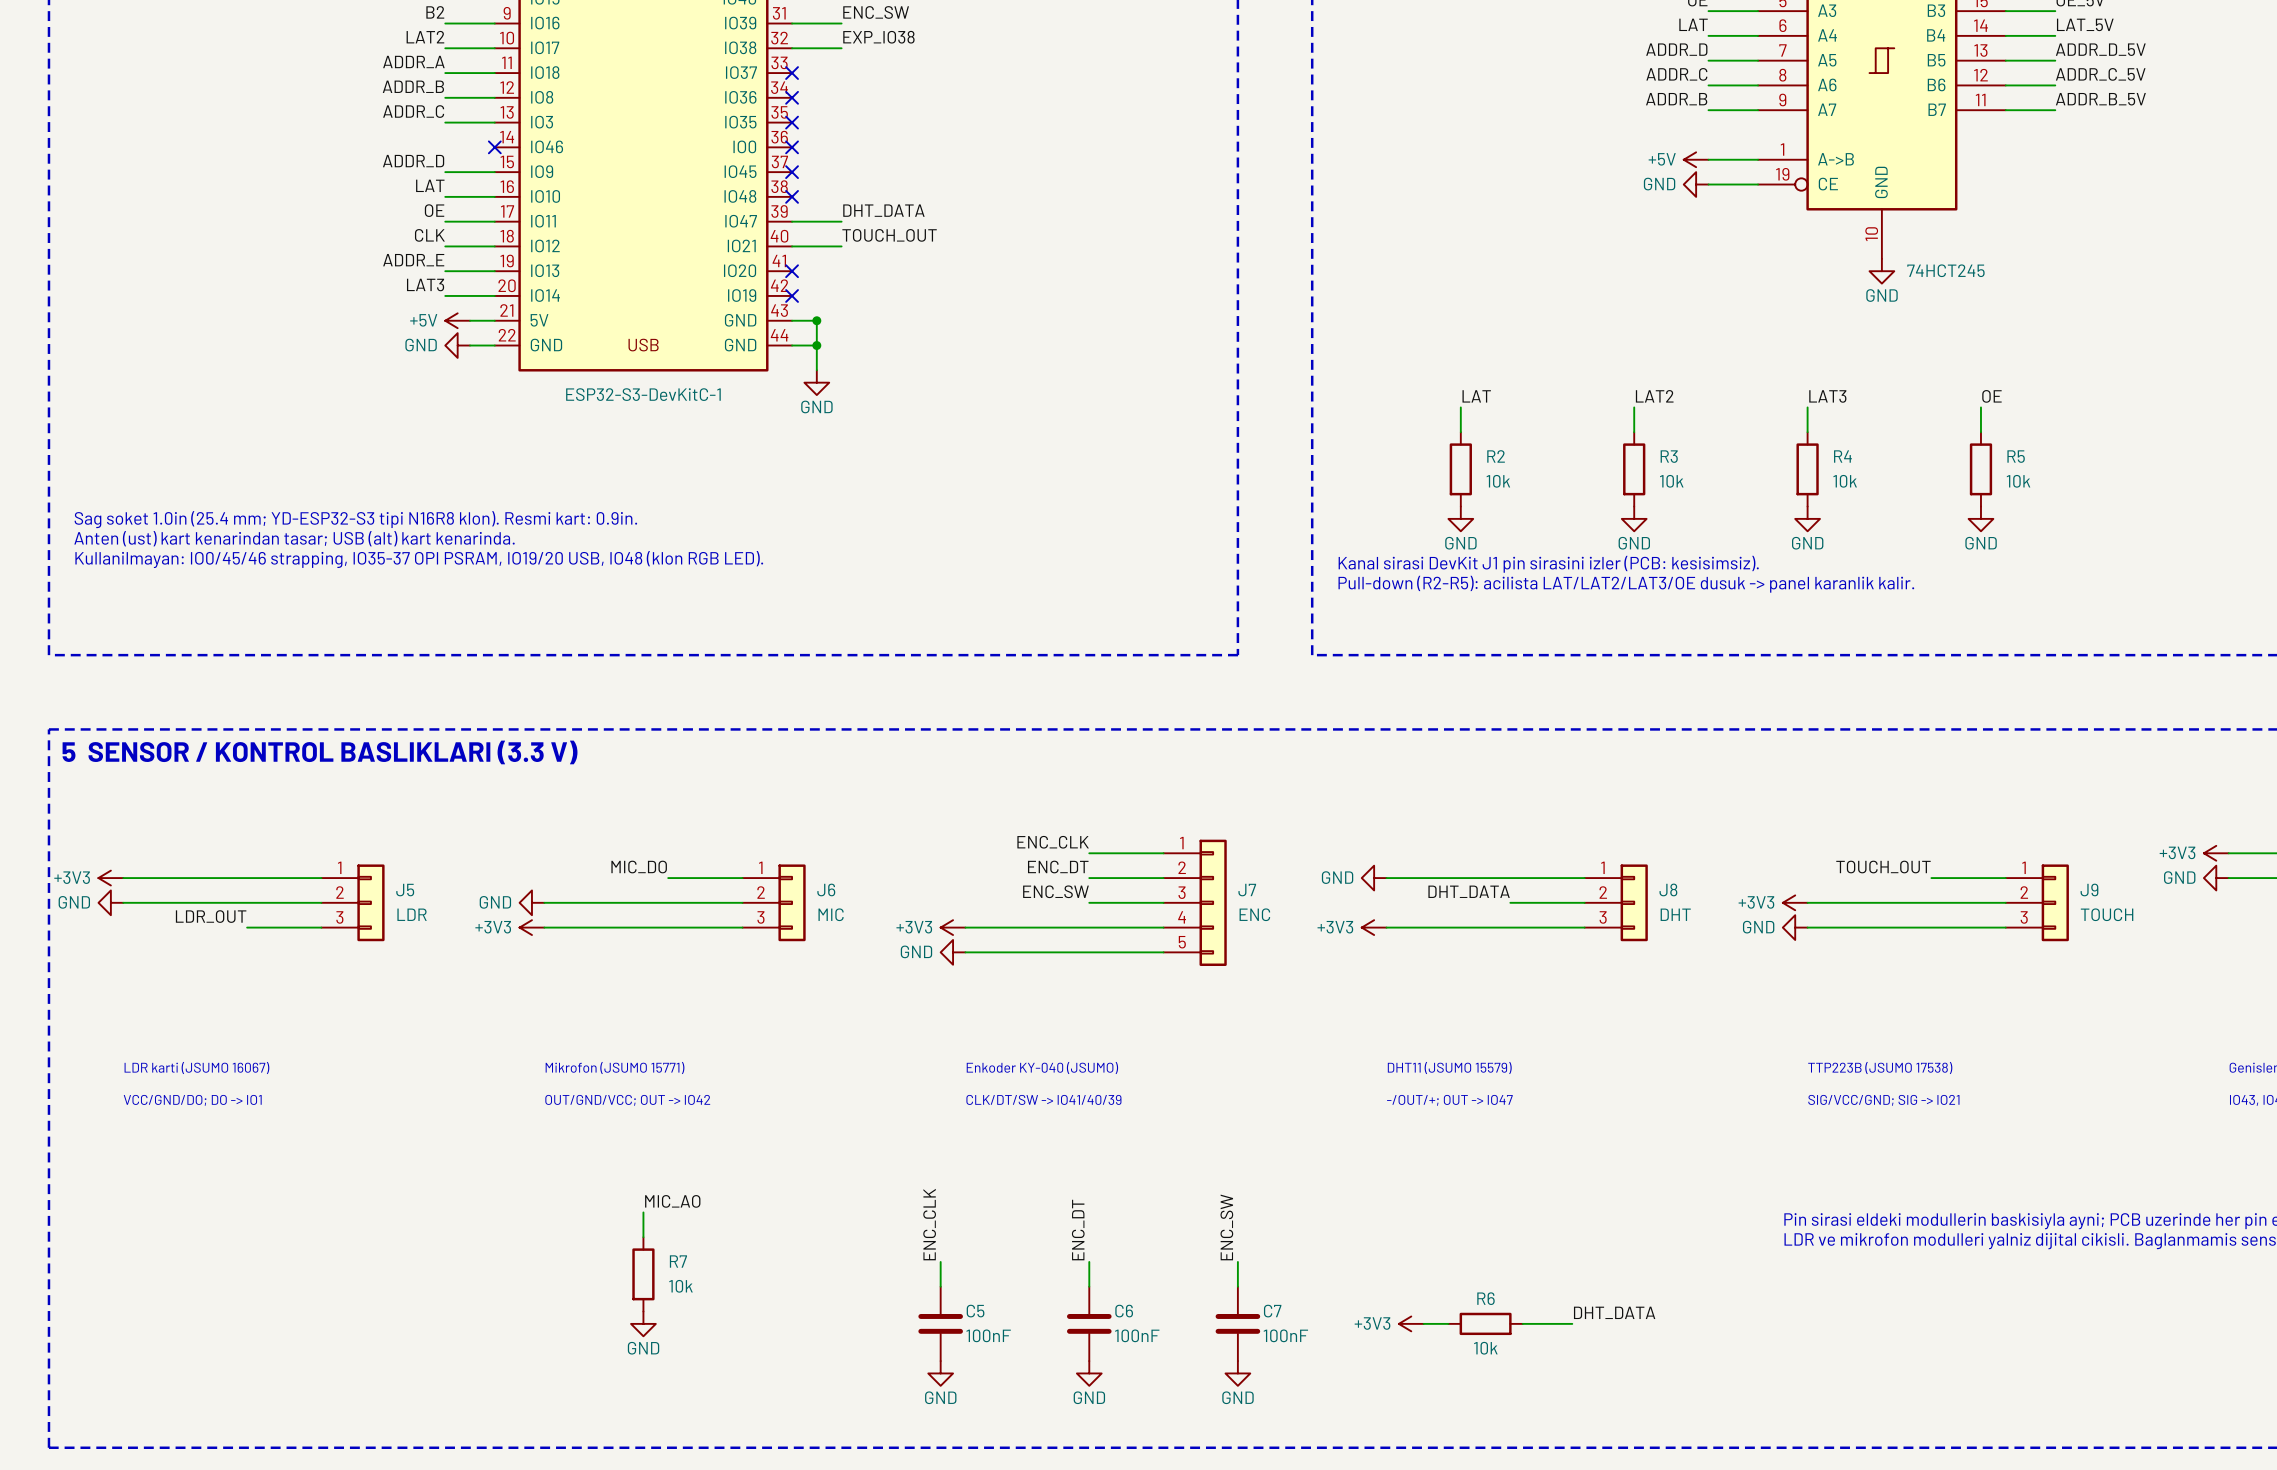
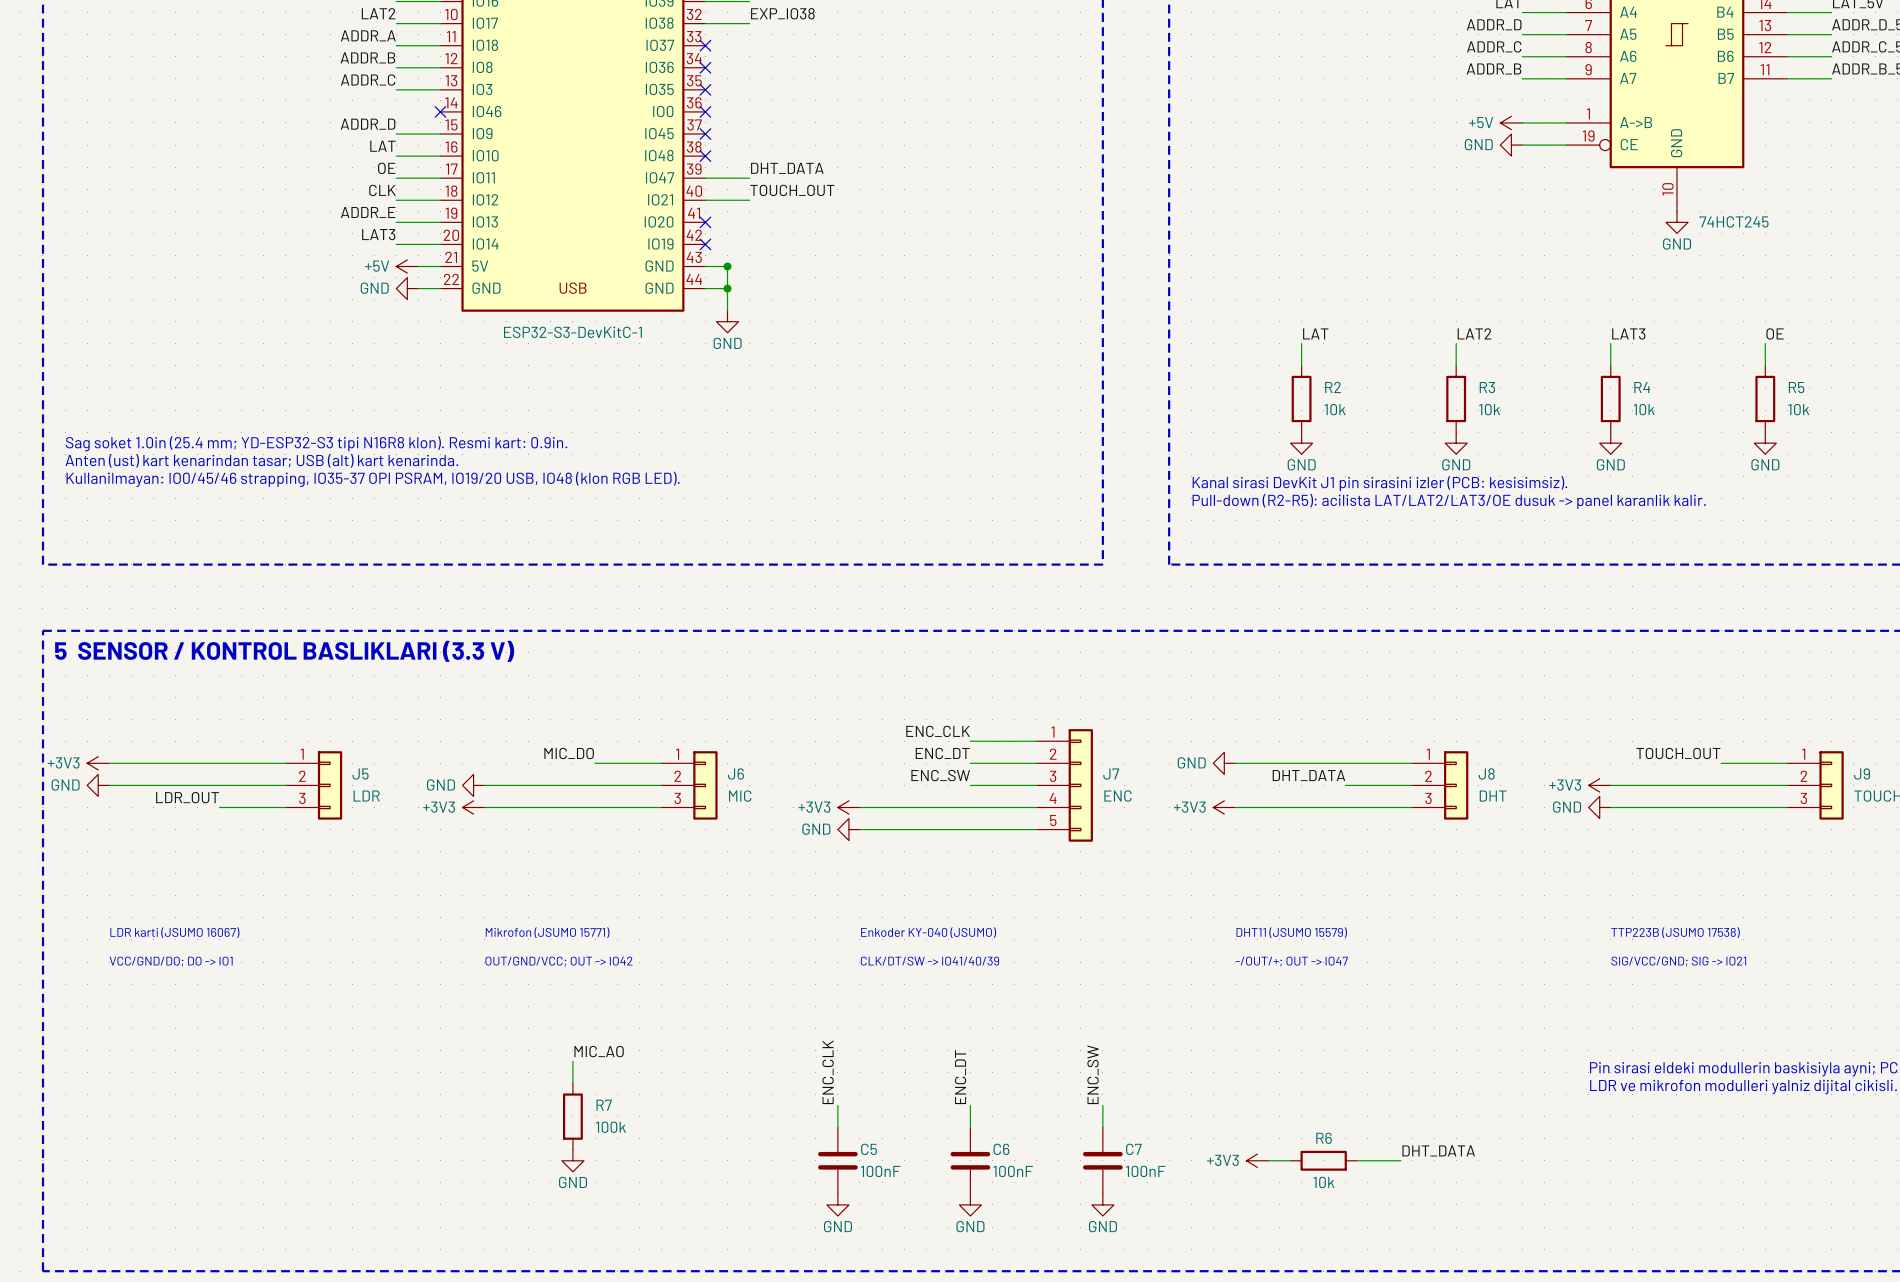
R7 value: 10k (680, 1286) -> 100k (610, 1127)

